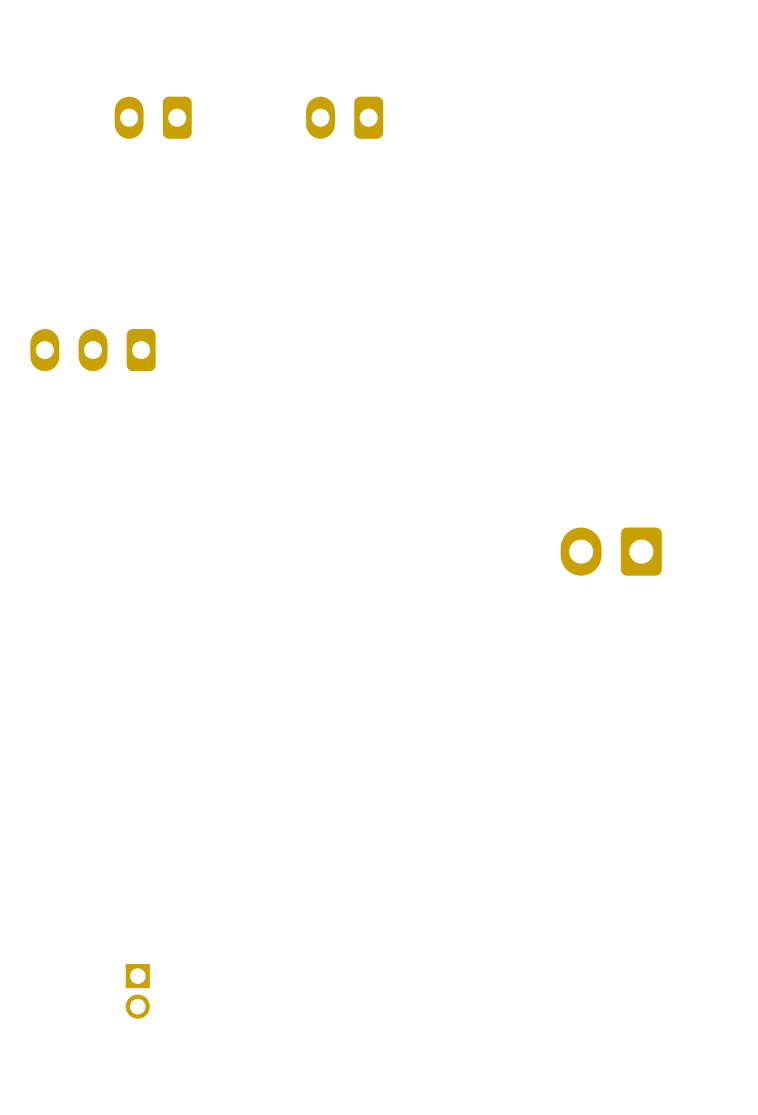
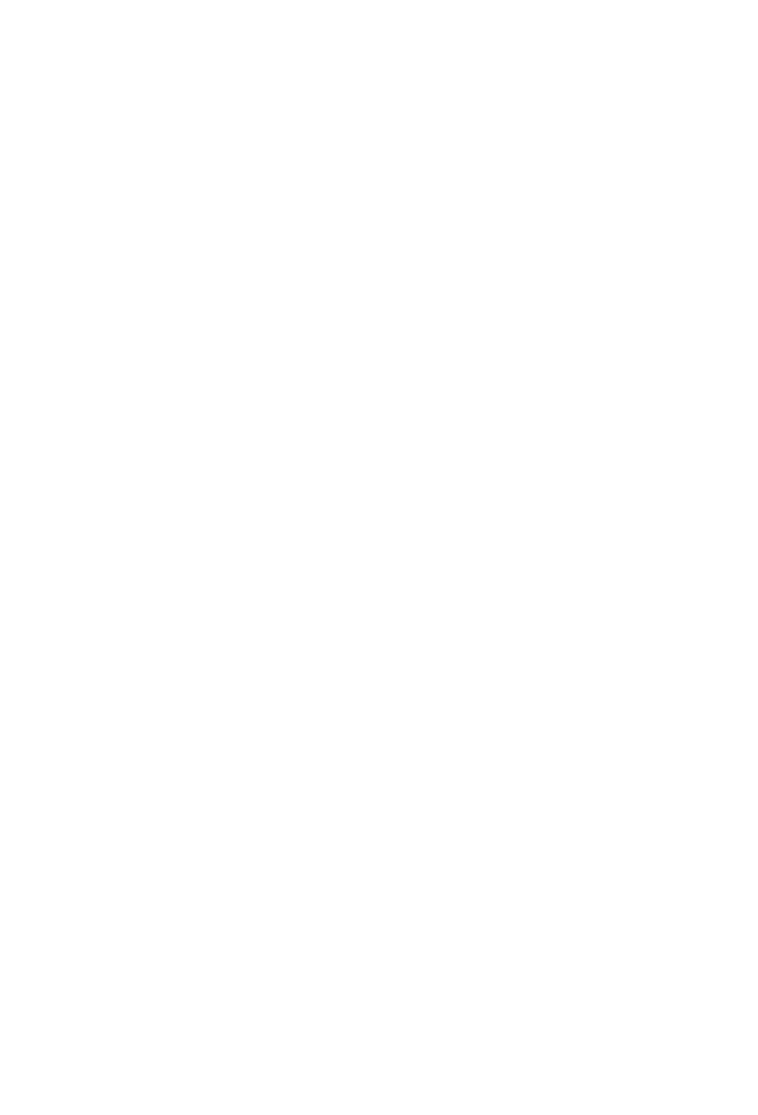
part: (153, 117) -> none
part: (344, 117) -> none
part: (93, 350) -> none
part: (611, 551) -> none
part: (137, 991) -> none

